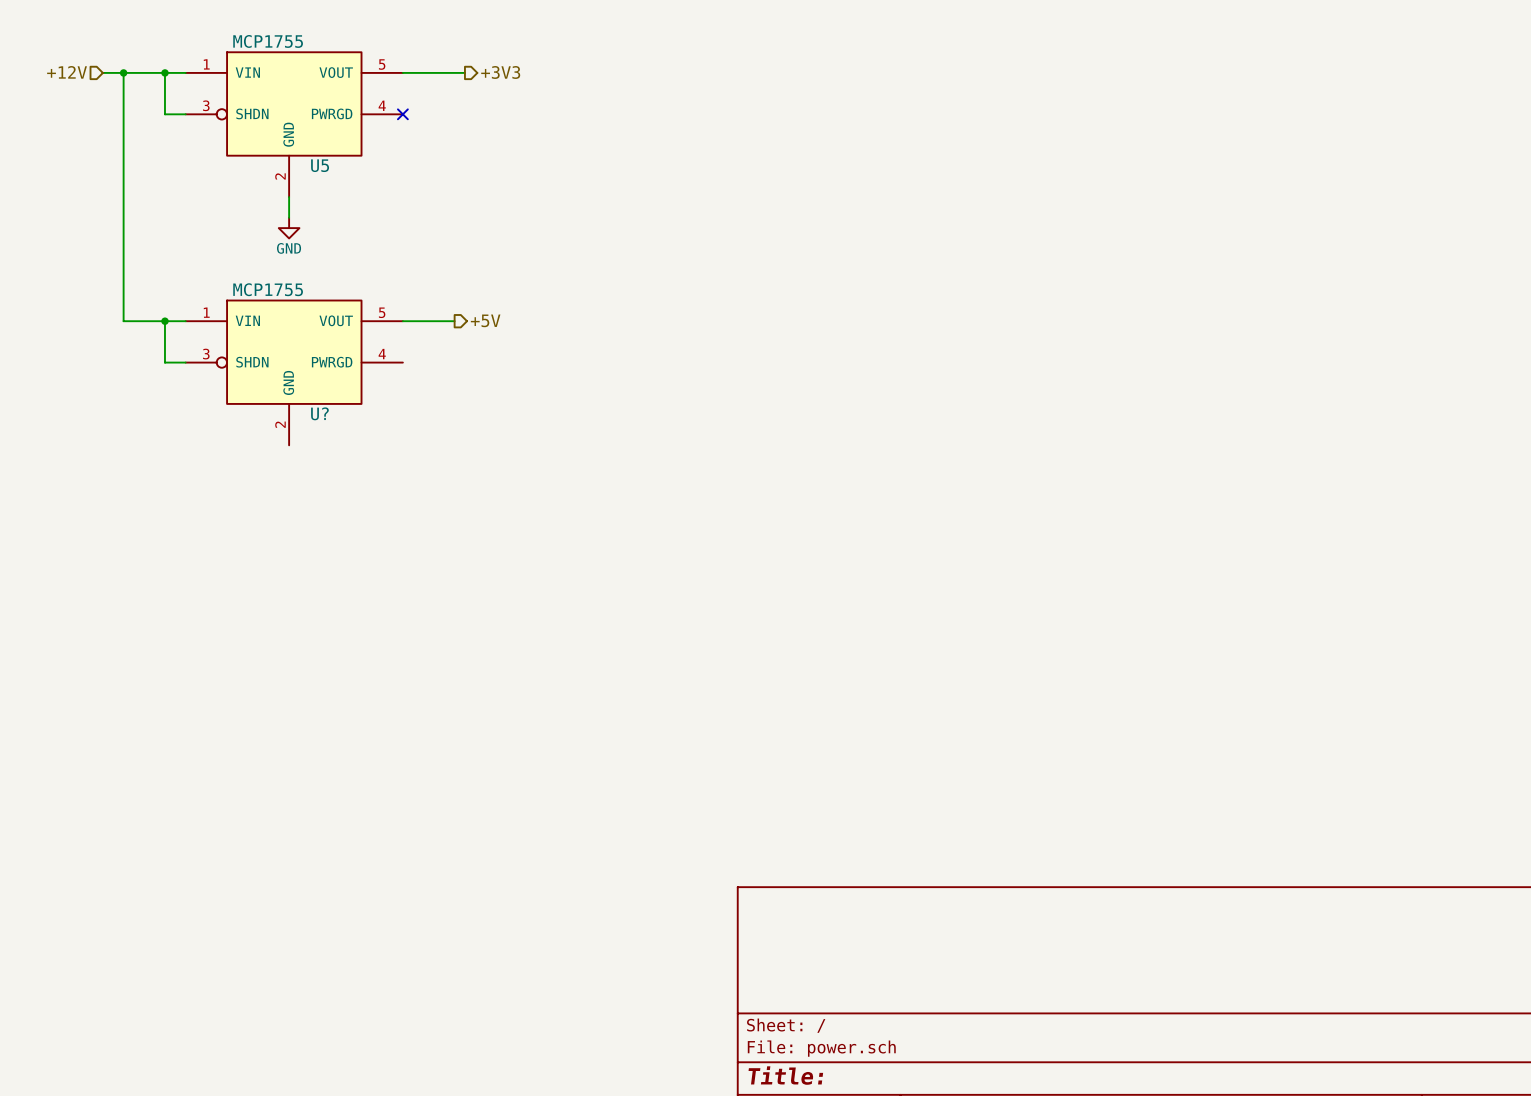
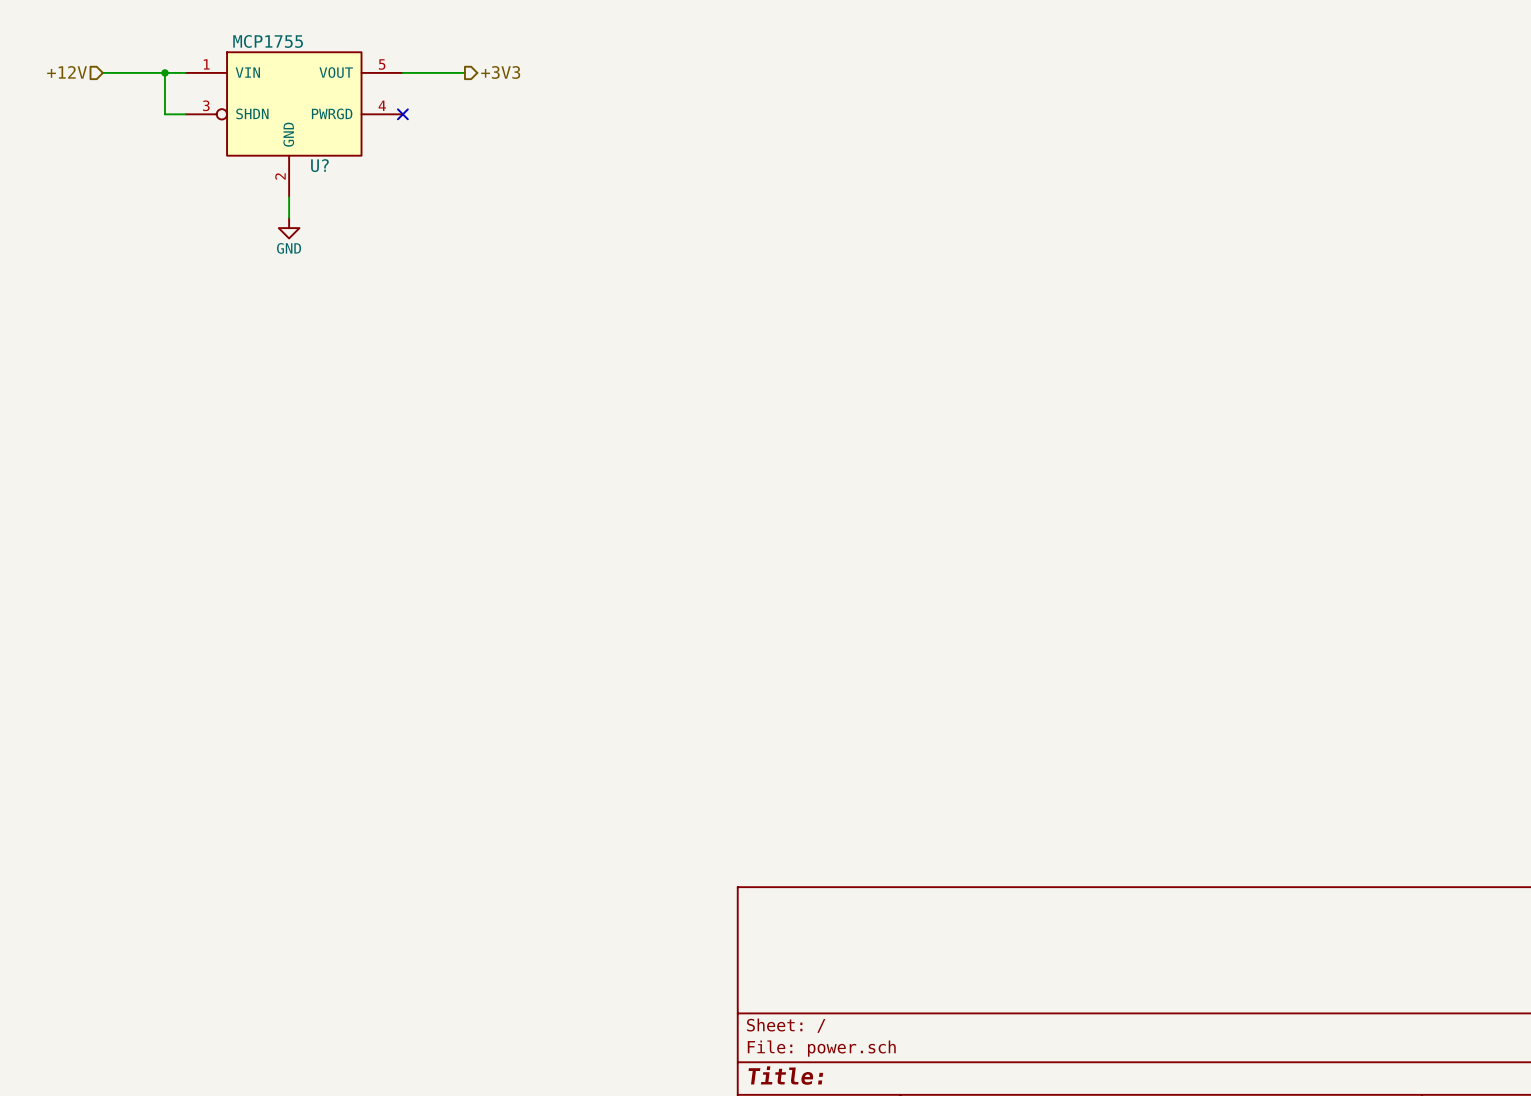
wire: (123, 72) (123, 321) (185, 321) -> none
junction: (123, 72) -> none
U5 name: U5 (320, 165) -> U? (319, 165)
hierarchical label: +5V (485, 320) -> none
wire: (164, 321) (164, 362) (185, 362) -> none
junction: (164, 321) -> none
wire: (402, 321) (454, 321) -> none
U?: MCP1755 (294, 372) -> none

